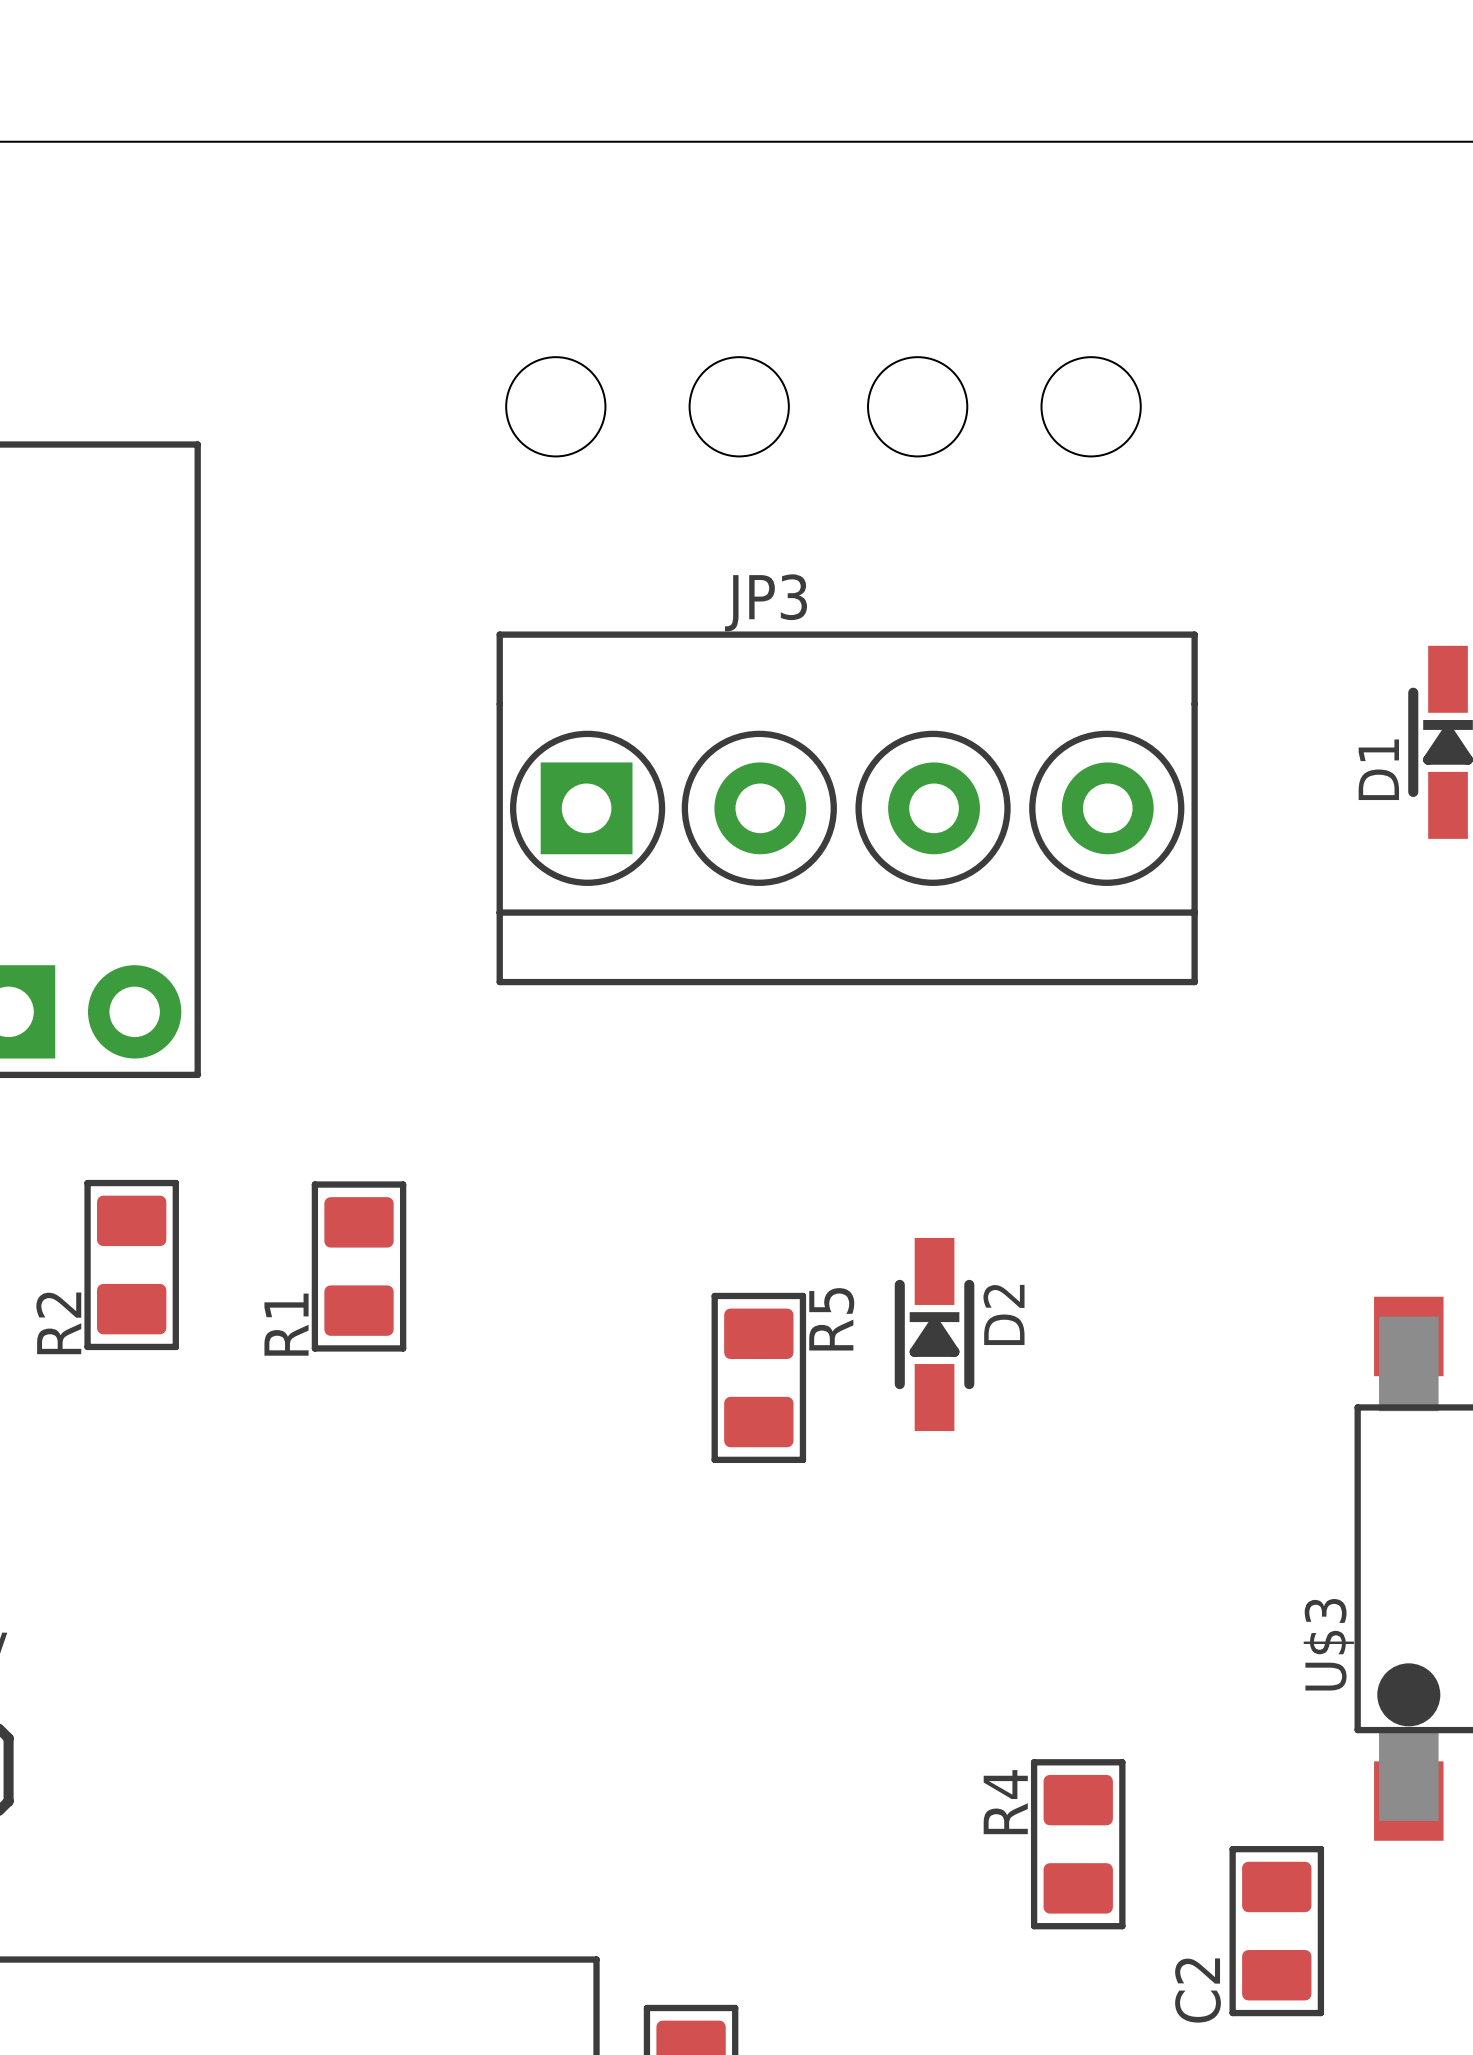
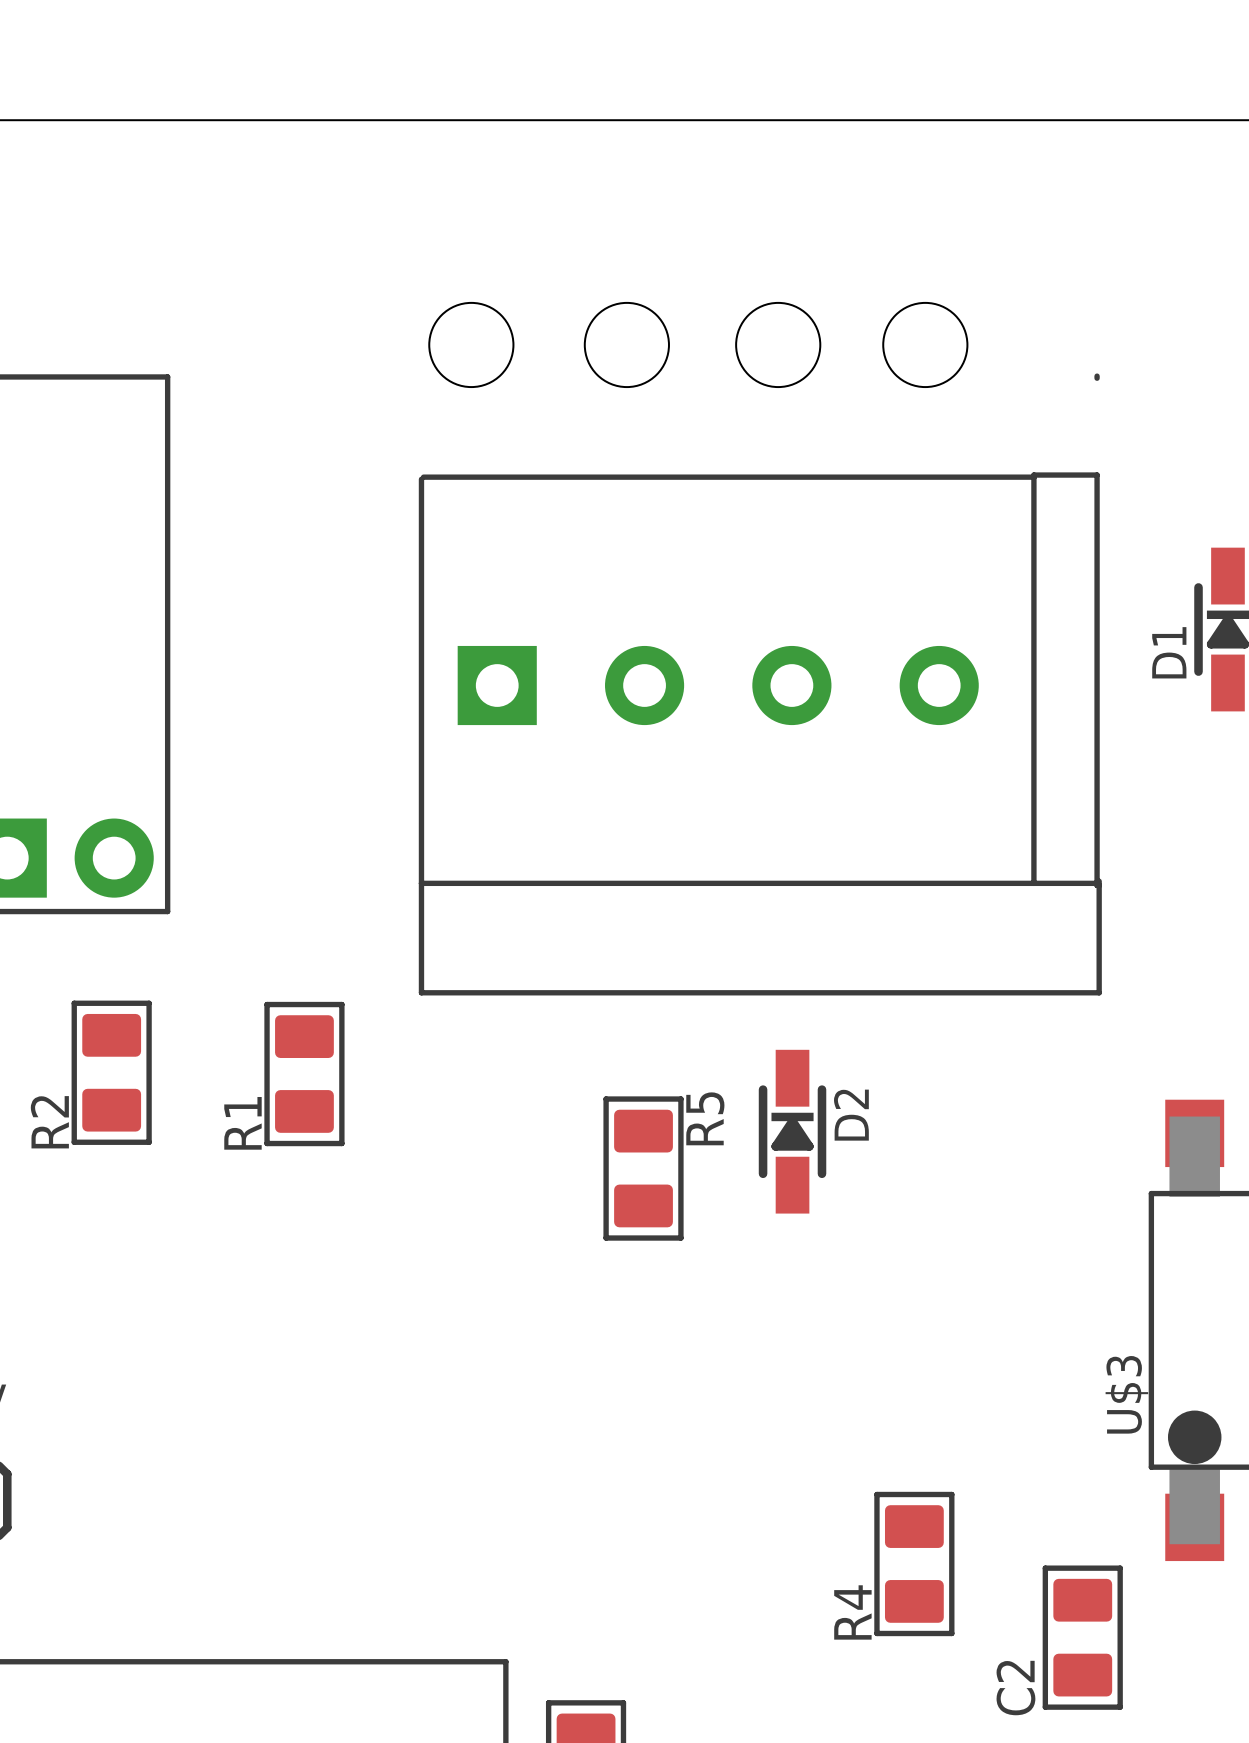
part: none -> (760, 684)
JP3: (847, 808) -> none
R4 name position: R4 (1005, 1802) -> R4 (852, 1612)

